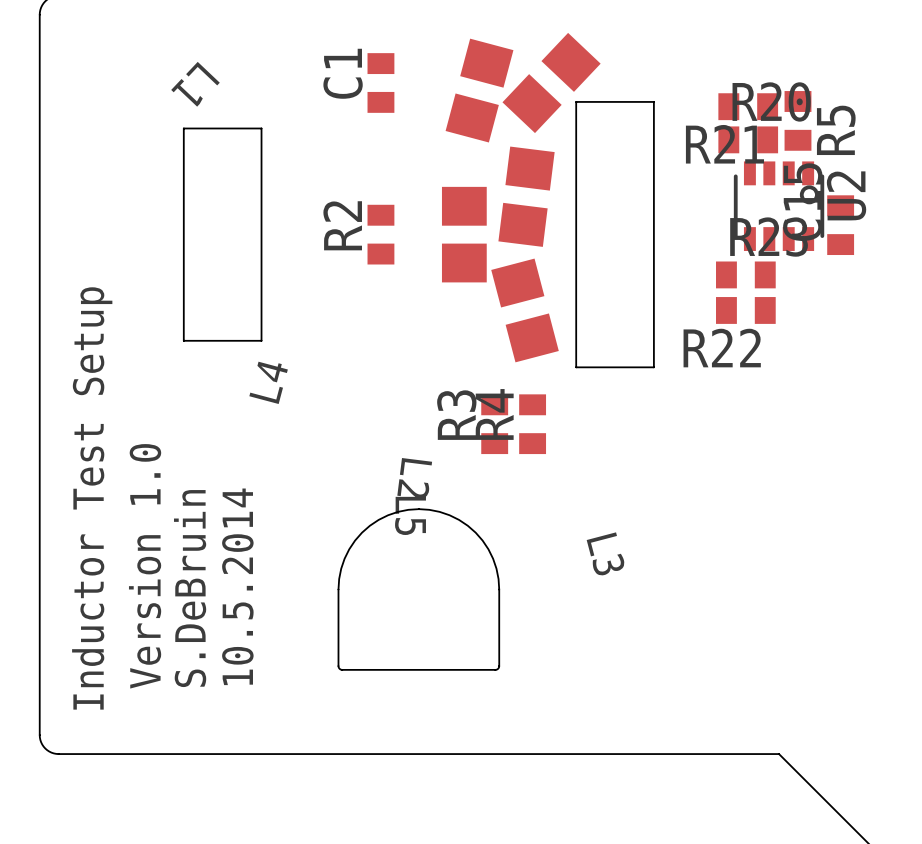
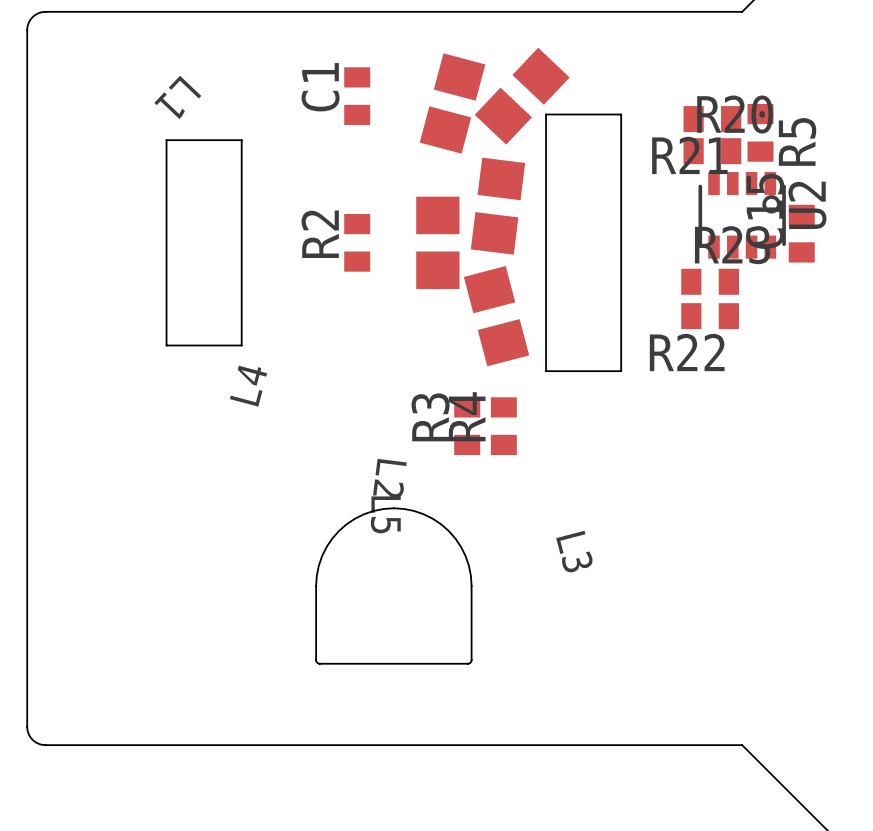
text: Inductor Test Setup (92, 498) -> none
text: Version 1.0 (145, 566) -> none
text: 10.5.2014 (237, 586) -> none
text: S.DeBruin (190, 588) -> none

